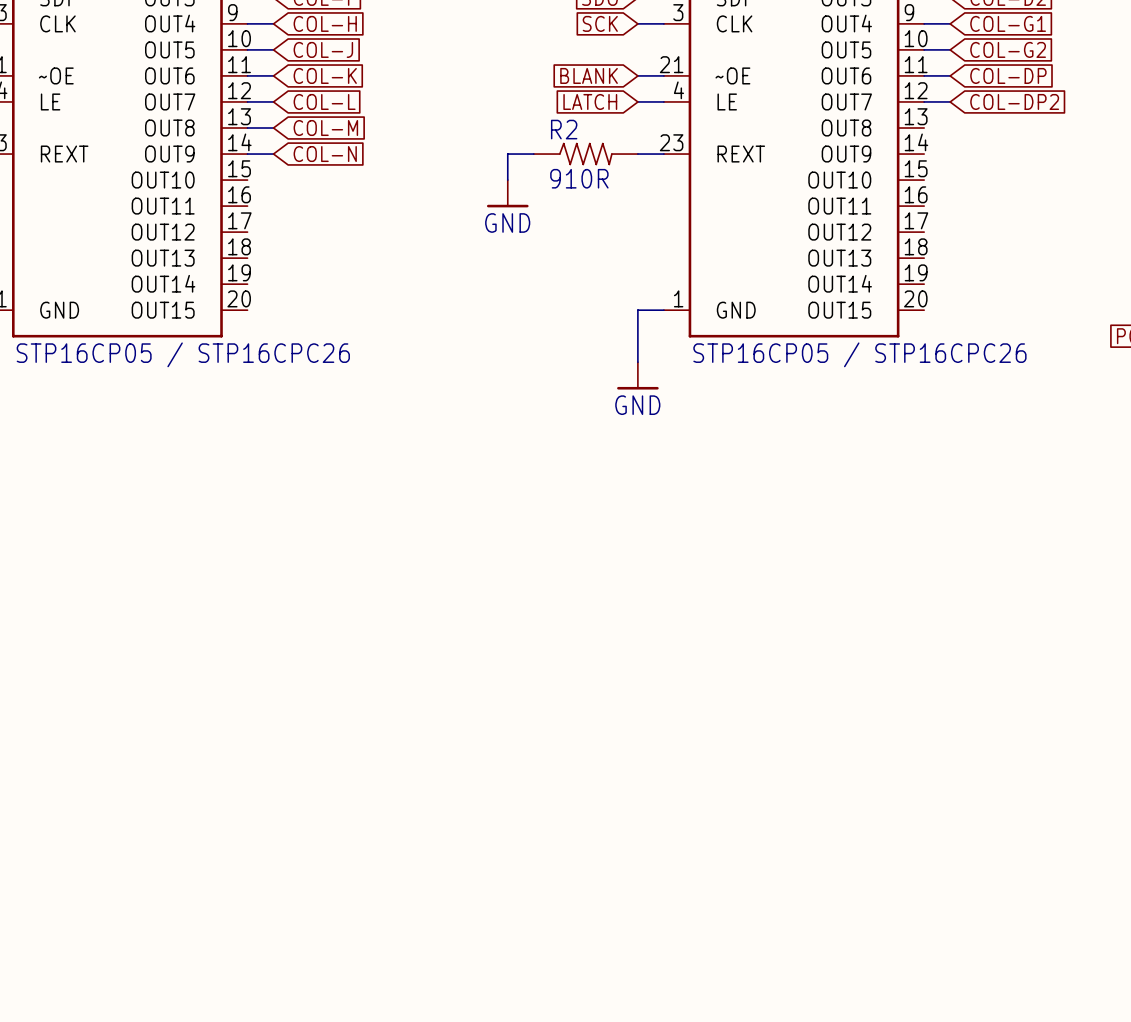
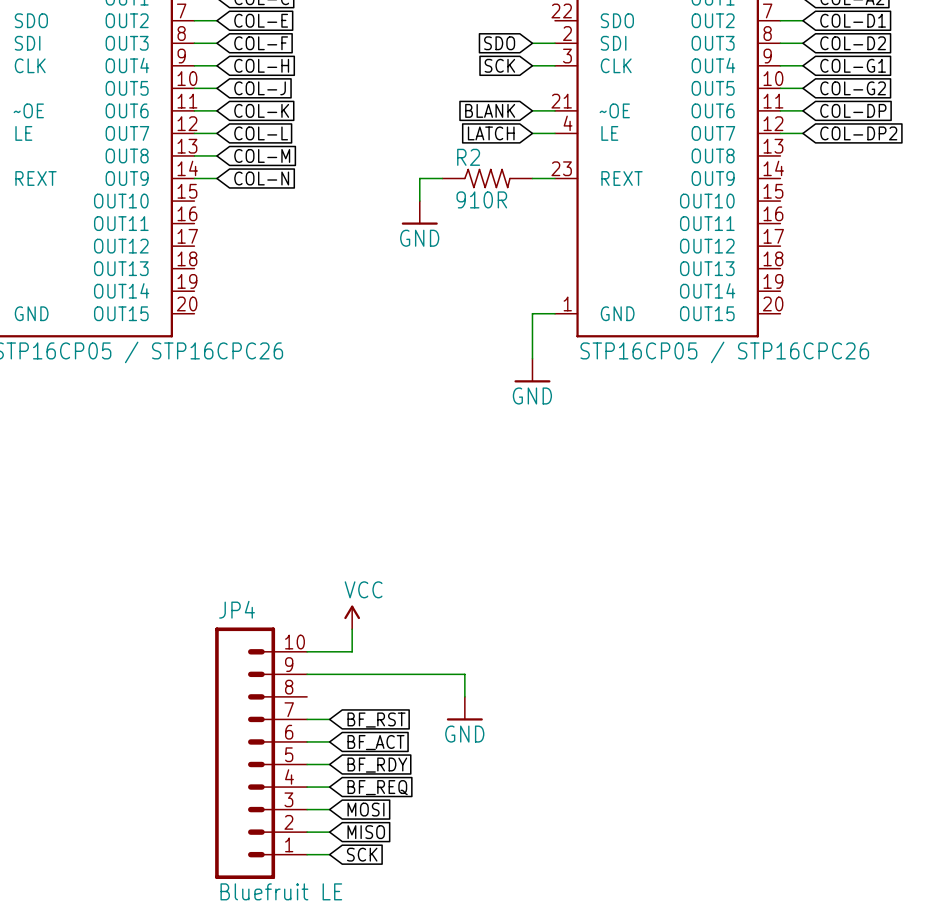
power symbol: none -> VCC (352, 617)
wire: none -> (352, 629) (352, 651) (307, 651)
wire: none -> (307, 674) (464, 674) (464, 696)
power symbol: none -> GND (464, 708)
wire: none -> (307, 719) (329, 719)
global label: none -> BF_RST (376, 720)
wire: none -> (307, 741) (329, 741)
global label: none -> BF_ACT (376, 742)
JP4: none -> Bluefruit LE (261, 753)
wire: none -> (307, 764) (329, 764)
global label: none -> BF_RDY (377, 765)
wire: none -> (307, 787) (329, 787)
global label: none -> BF_REQ (377, 787)
wire: none -> (307, 809) (329, 809)
global label: none -> MOSI (365, 809)
wire: none -> (307, 832) (329, 832)
global label: none -> MISO (366, 832)
wire: none -> (307, 854) (329, 854)
global label: none -> SCK (362, 854)

